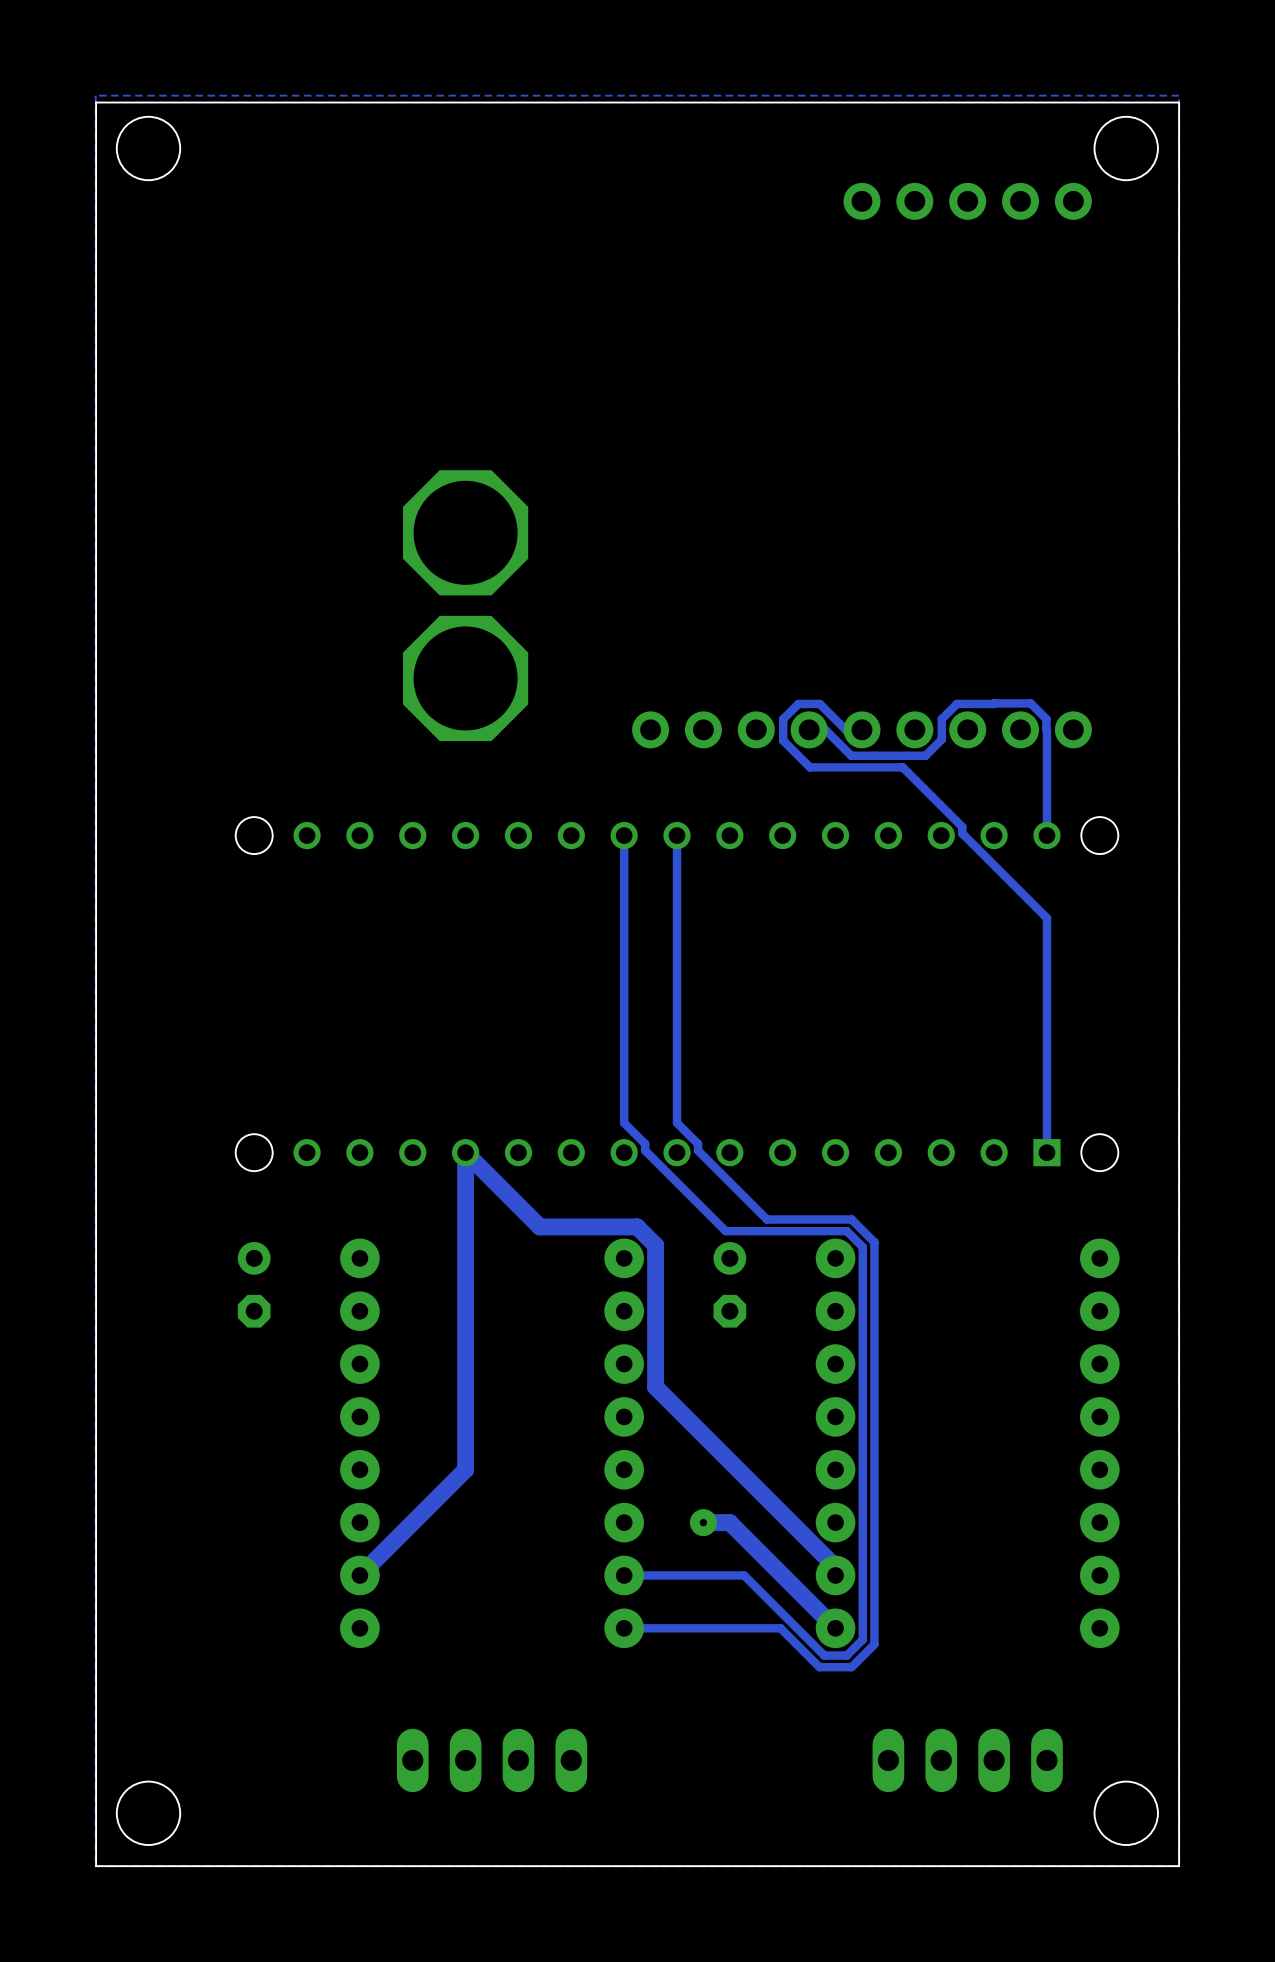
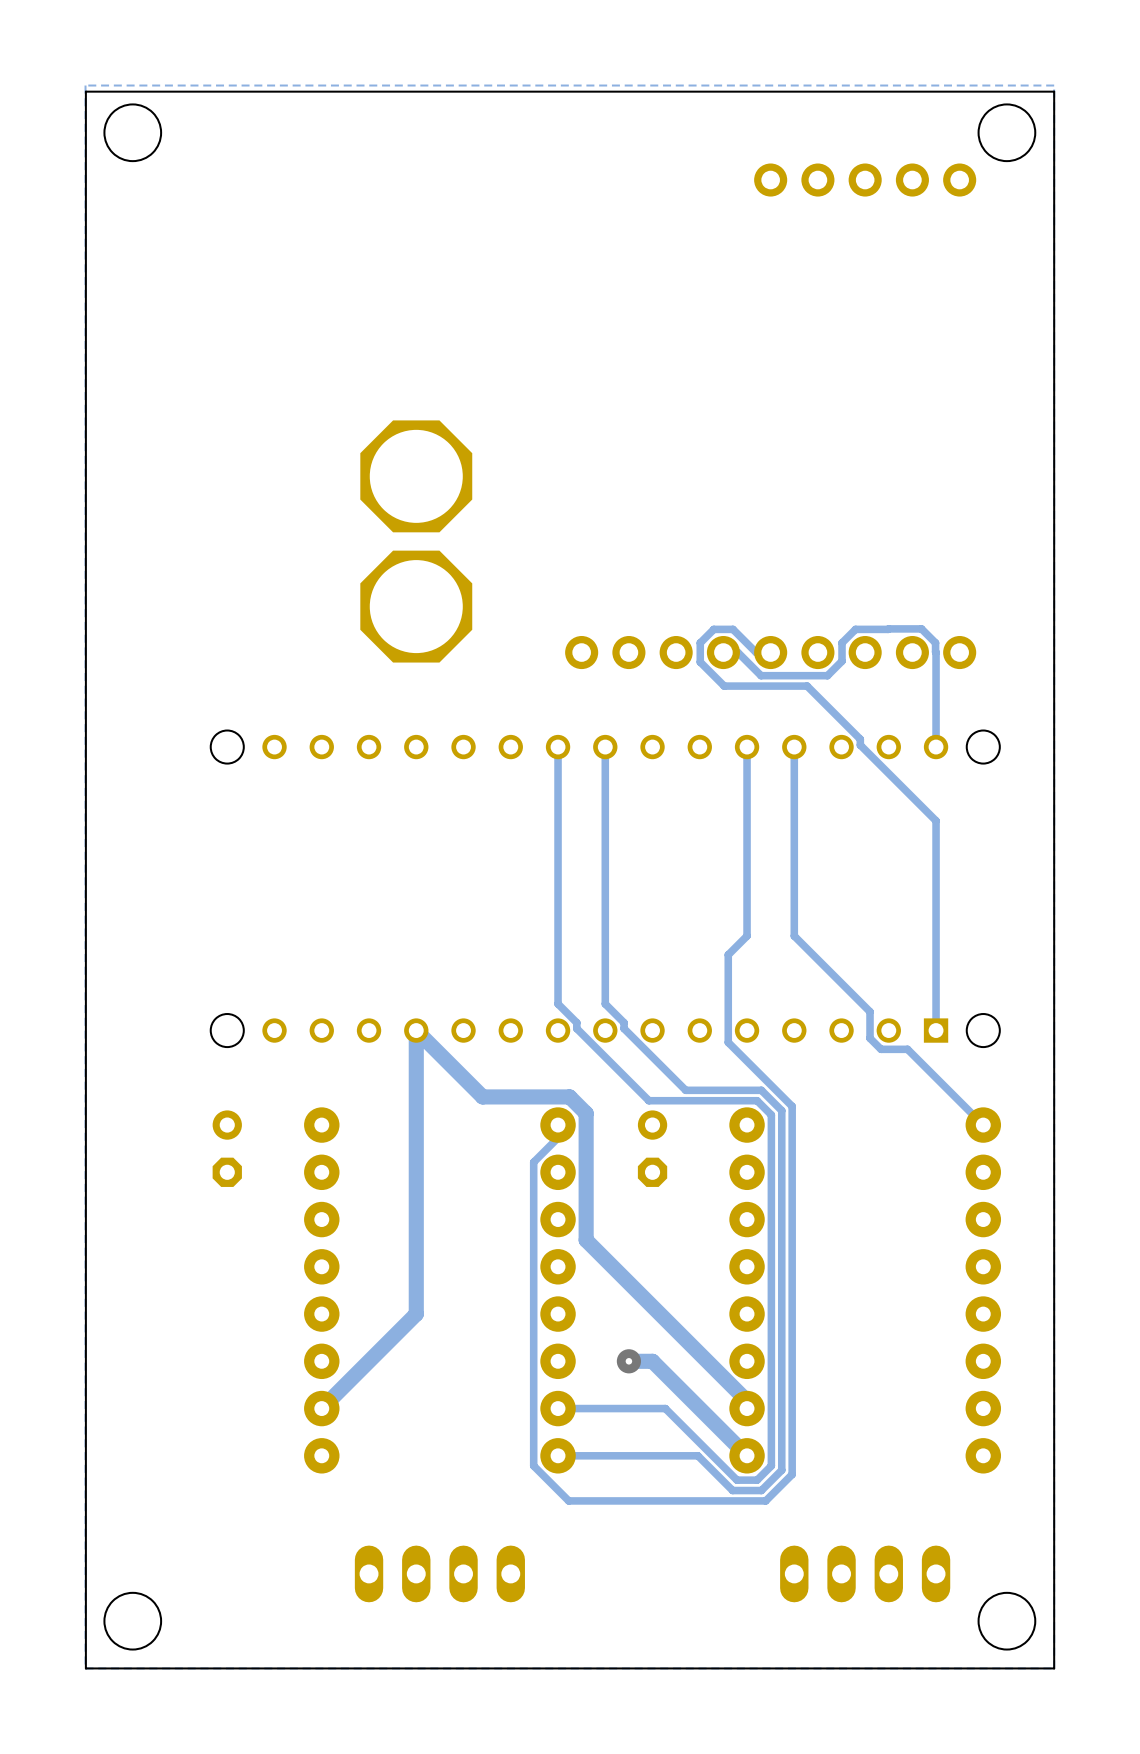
track: none -> (747, 747) (747, 936) (728, 954) (728, 1042) (792, 1106) (792, 1474) (765, 1500) (568, 1500) (533, 1465) (533, 1162) (558, 1137) (558, 1125)
track: none -> (794, 747) (794, 936) (870, 1011) (870, 1038) (881, 1049) (907, 1049) (983, 1125)

